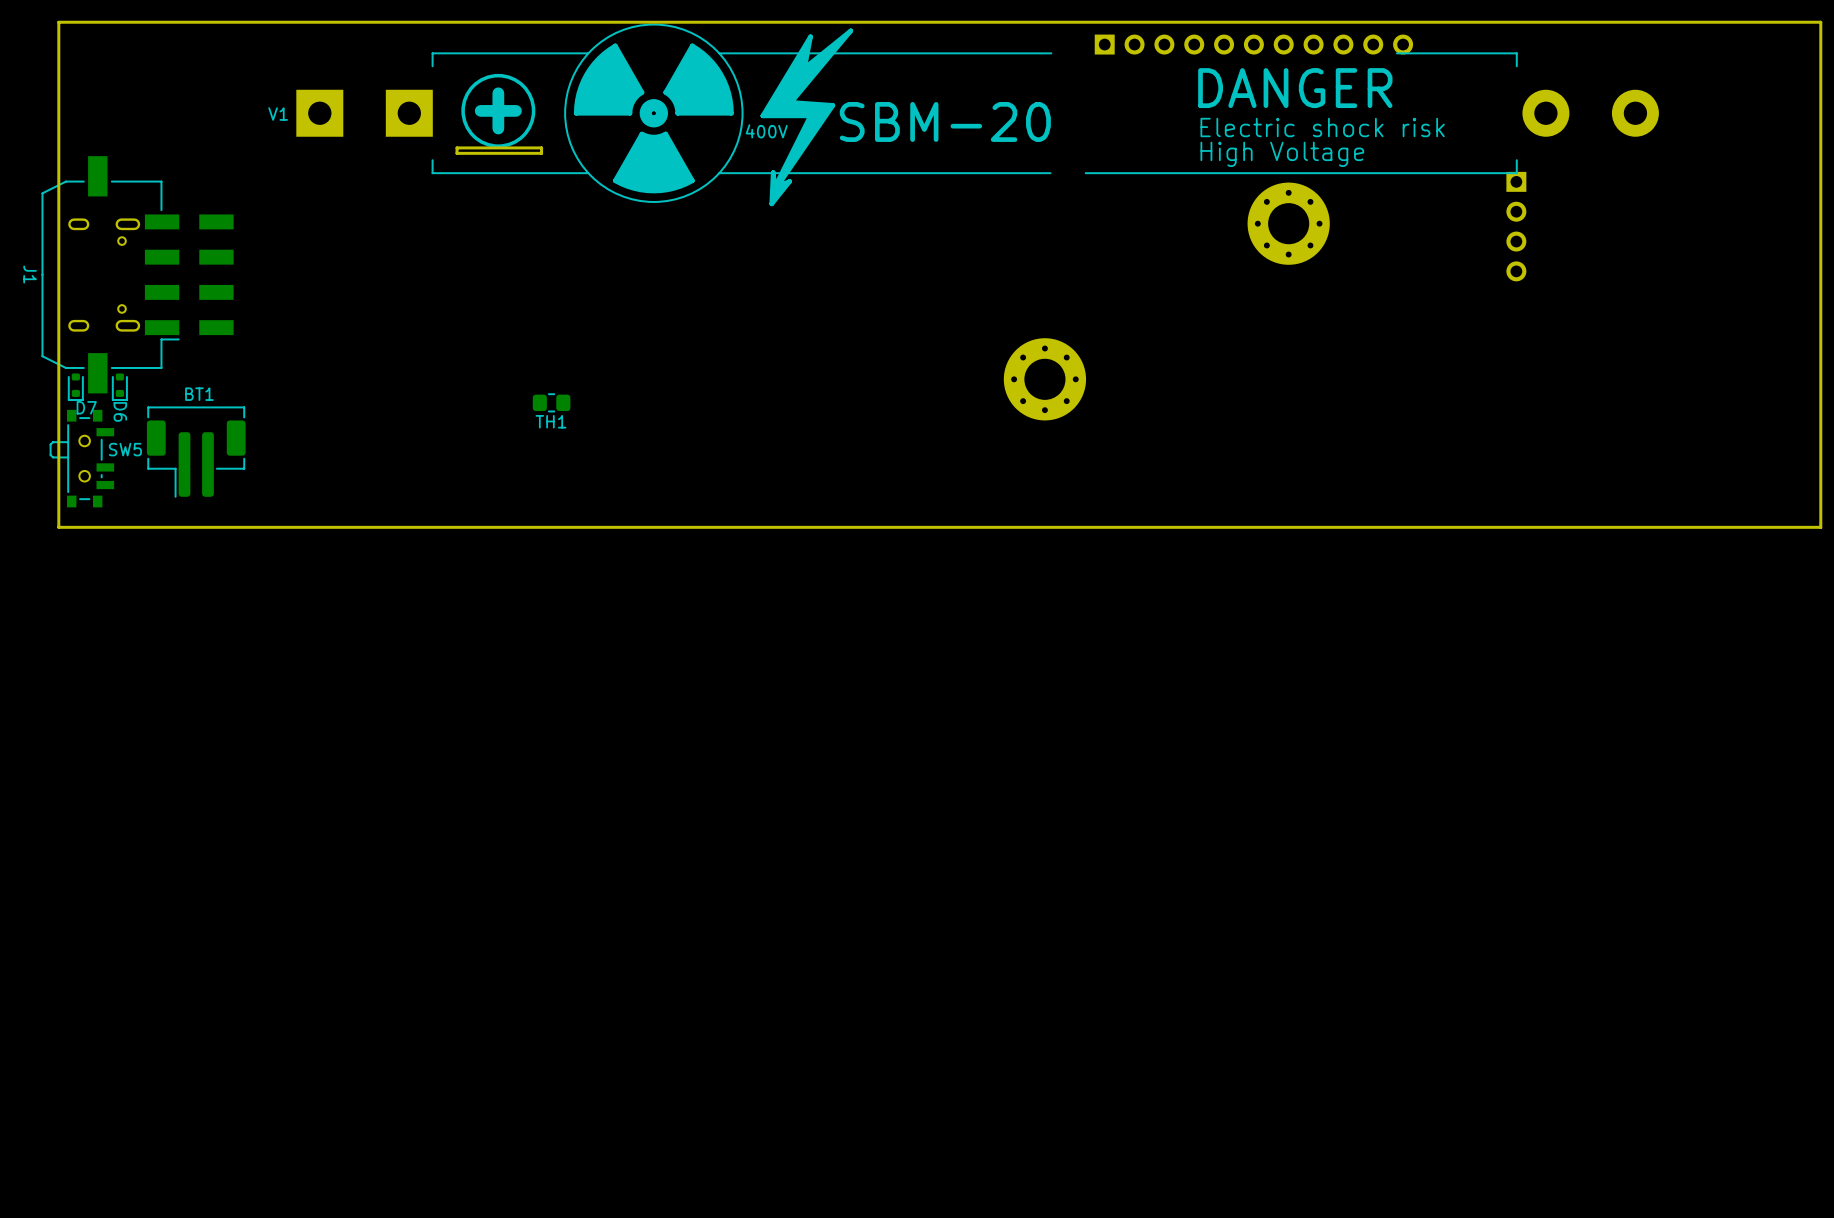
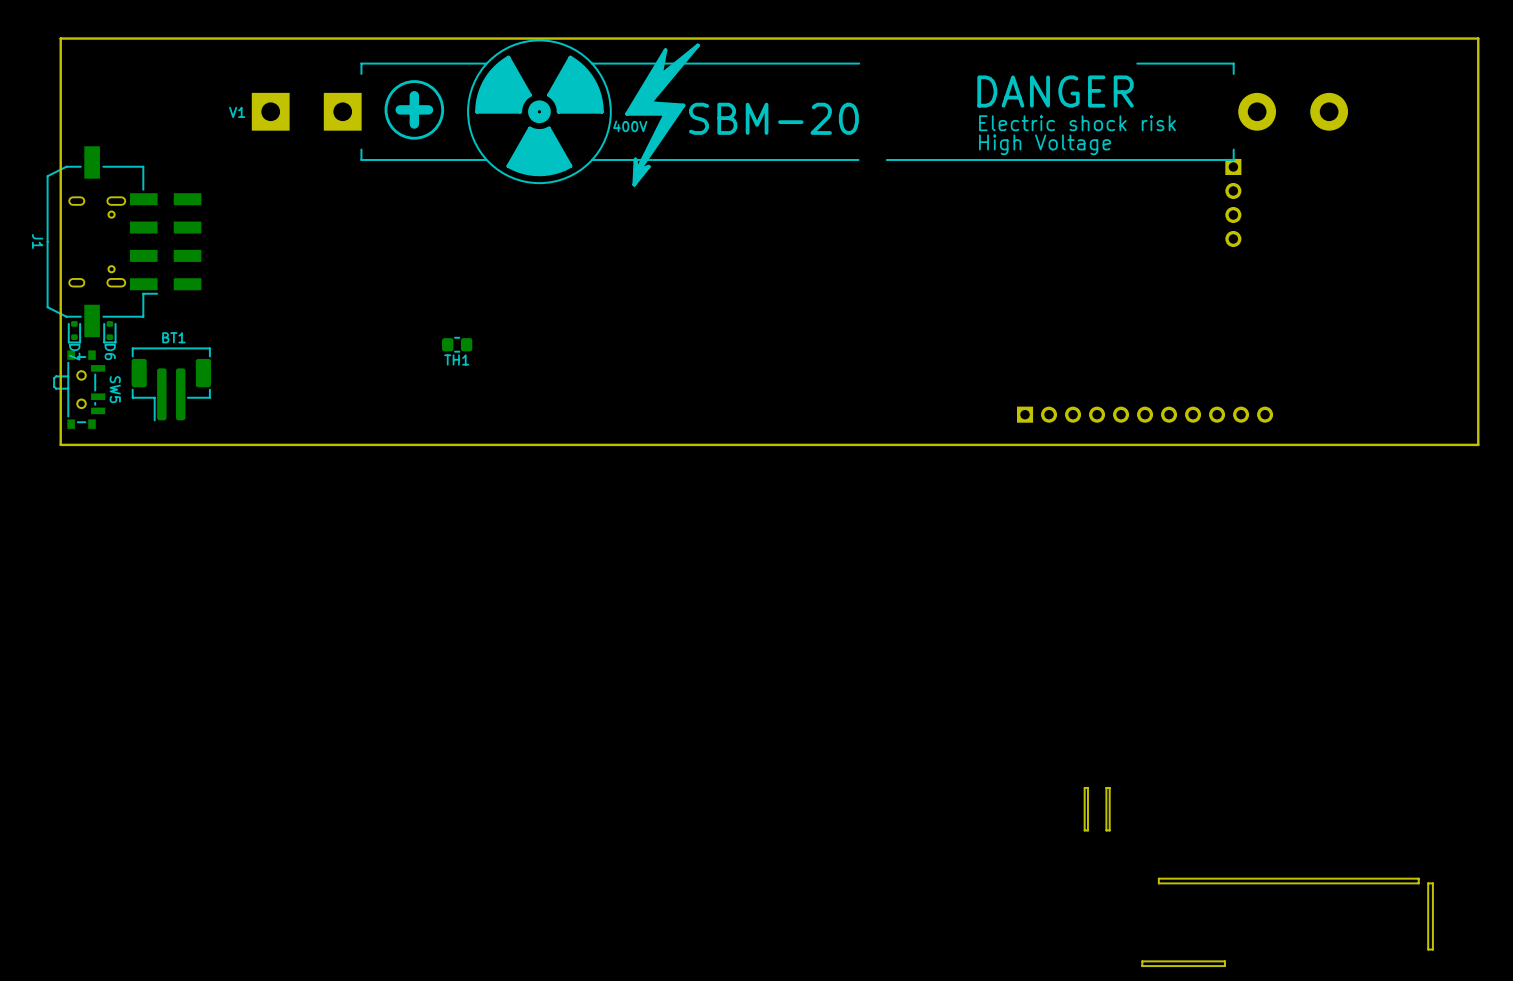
part: (1253, 44) -> none
board edge: (541, 147) (457, 147) (457, 153) (541, 153) (541, 147) -> none
part: (1288, 223) -> none
part: (1044, 379) -> none
D7 name rotation: 0° (86, 407) -> 90° clockwise (74, 352)
SW5 name rotation: 0° (125, 449) -> 90° clockwise (115, 389)
part: none -> (1145, 414)
board edge: none -> (1087, 787) (1084, 787) (1084, 830) (1087, 830) (1087, 787)
board edge: none -> (1109, 787) (1106, 787) (1106, 830) (1109, 830) (1109, 787)
board edge: none -> (1418, 878) (1158, 878) (1158, 883) (1418, 883) (1418, 878)
board edge: none -> (1432, 883) (1428, 883) (1428, 949) (1432, 949) (1432, 883)
board edge: none -> (1225, 961) (1225, 966) (1142, 966) (1142, 961) (1225, 961)

